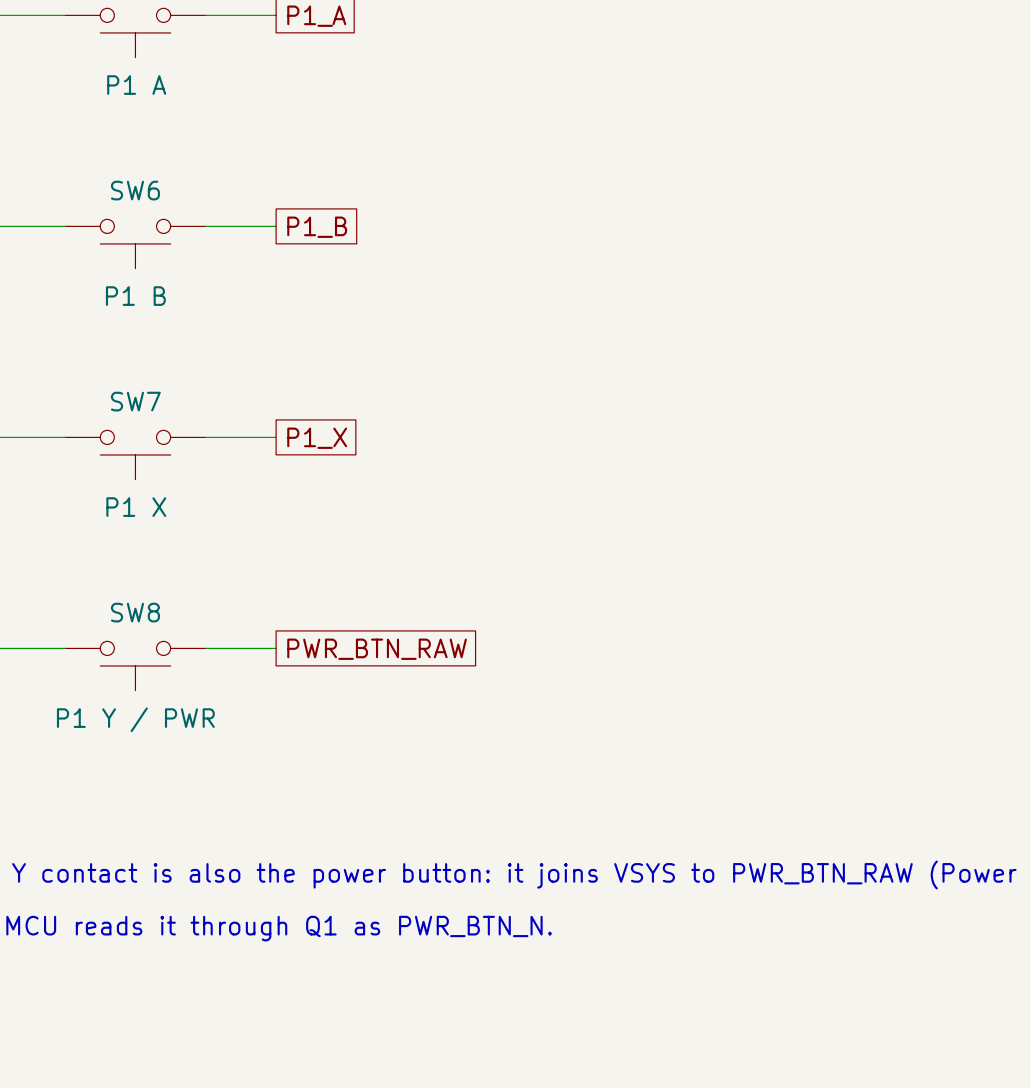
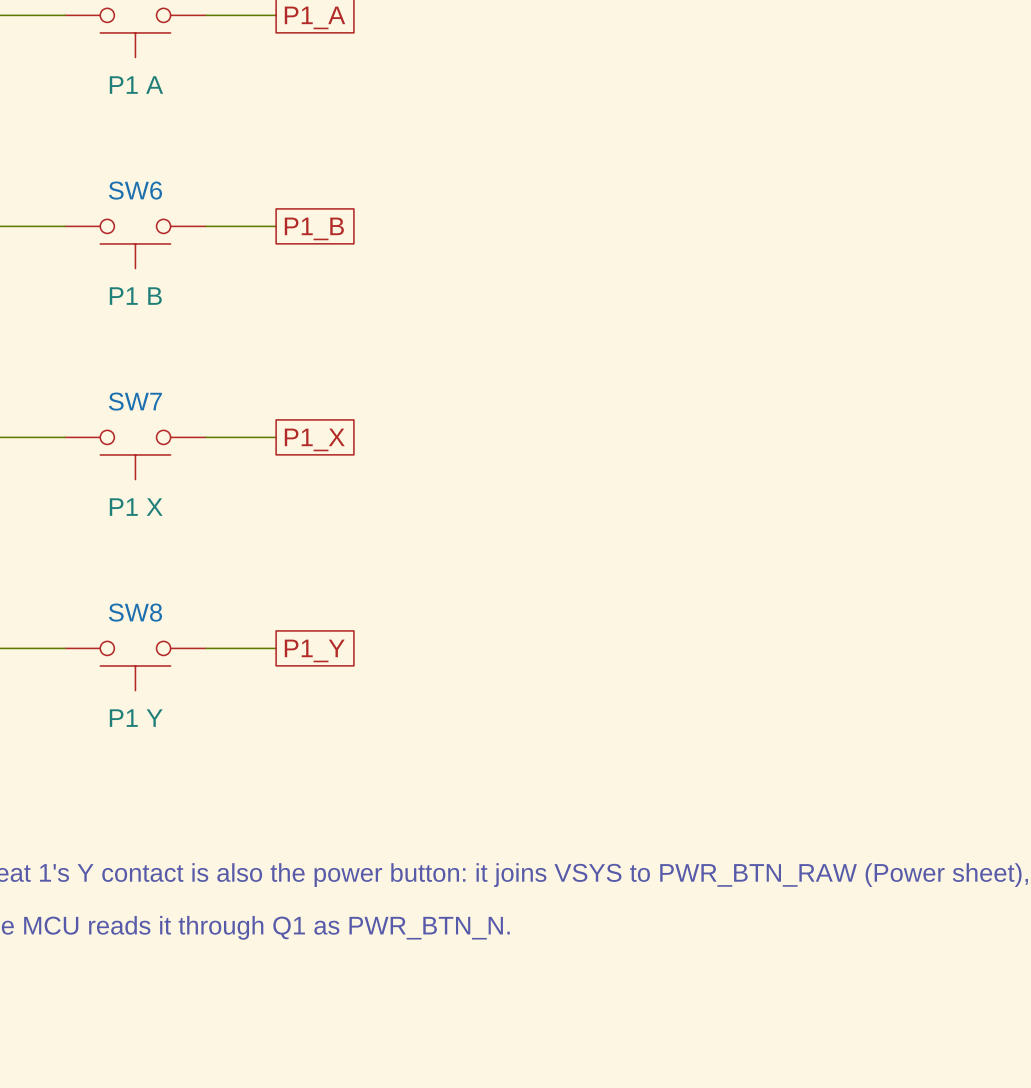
global label: PWR_BTN_RAW (377, 649) -> P1_Y (314, 650)
SW8 value: P1 Y / PWR (135, 719) -> P1 Y (136, 718)

